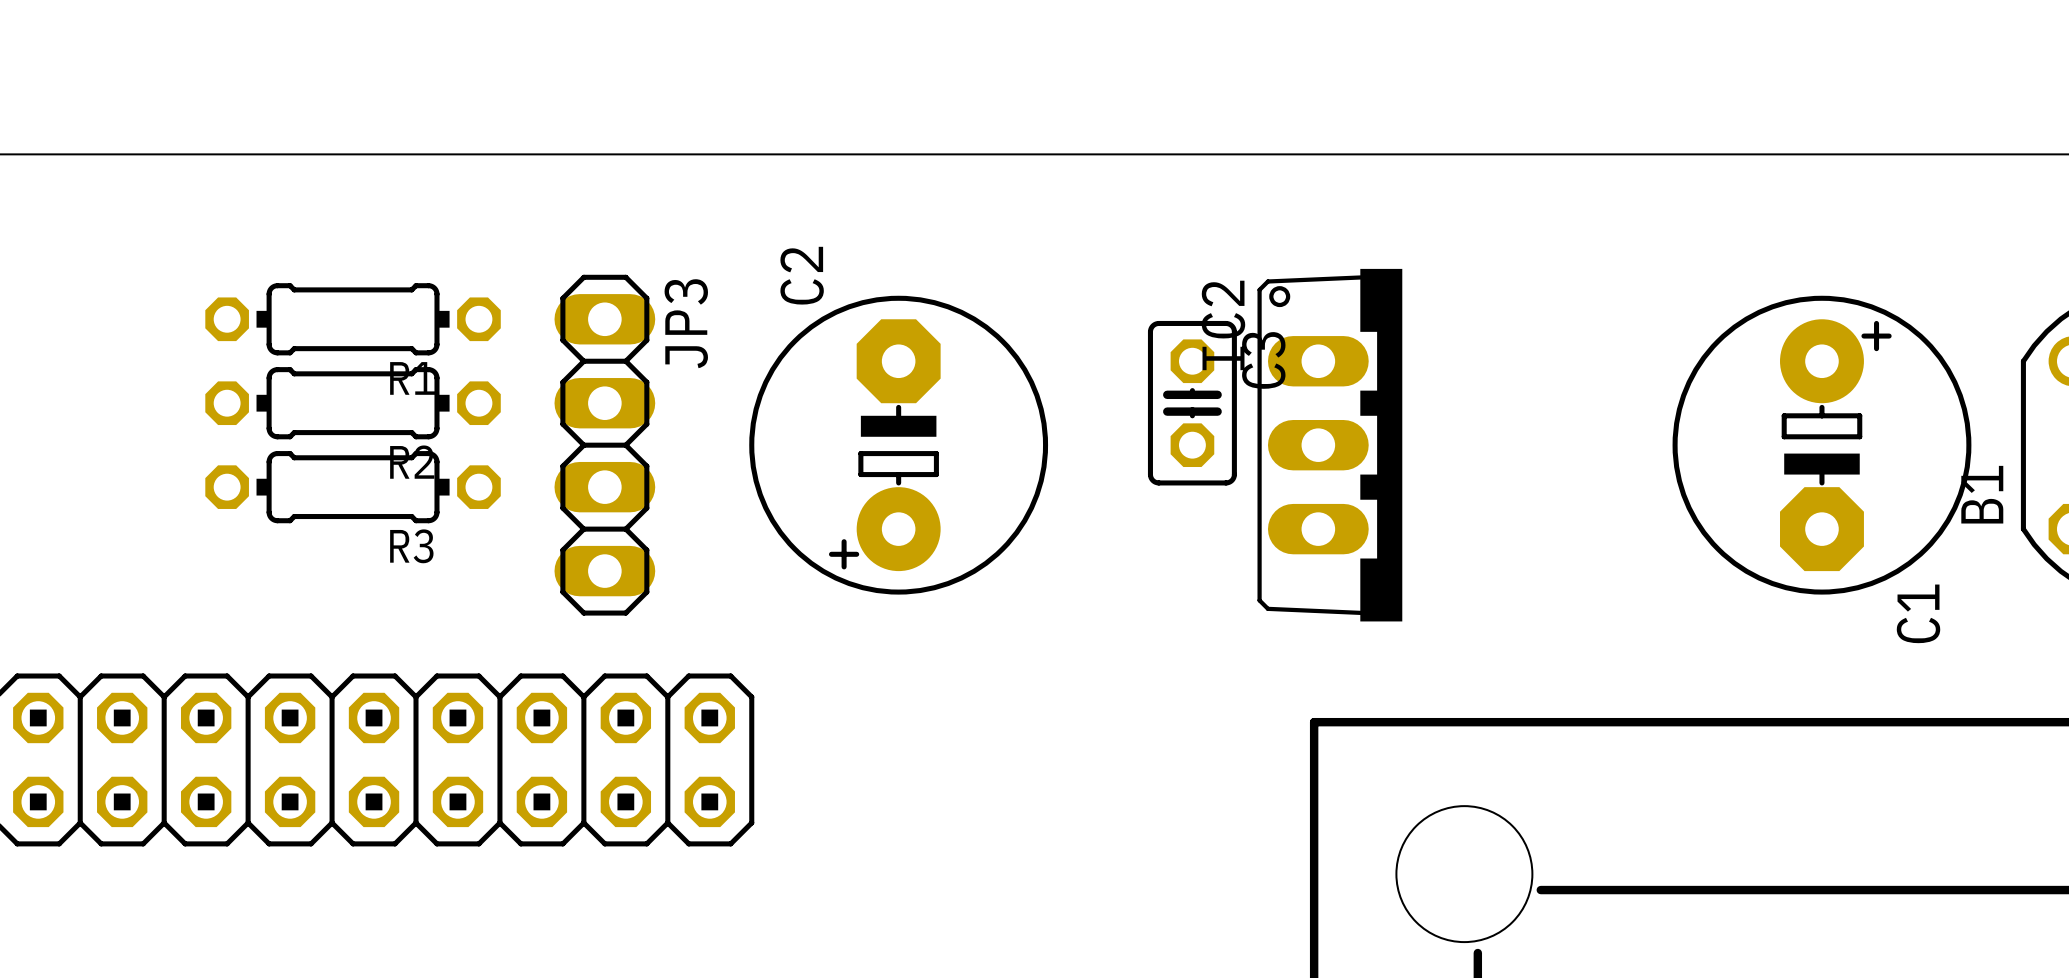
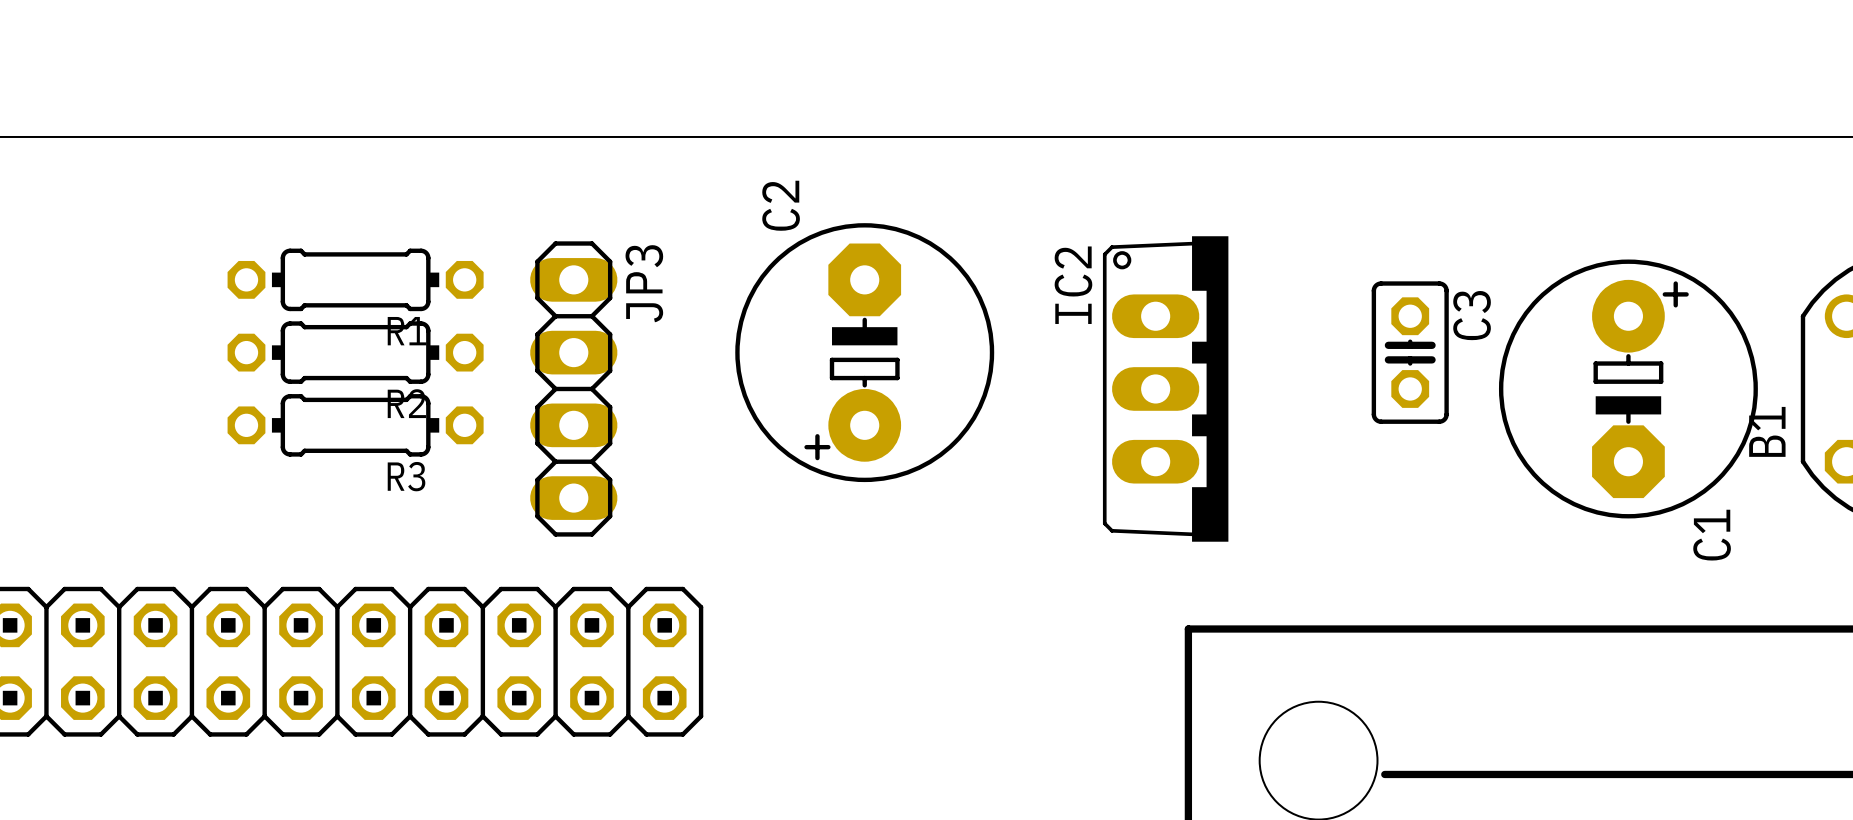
C3 position: (1192, 403) -> (1410, 352)
C2 position: (898, 445) -> (864, 352)
IC2 position: (1329, 445) -> (1165, 388)

